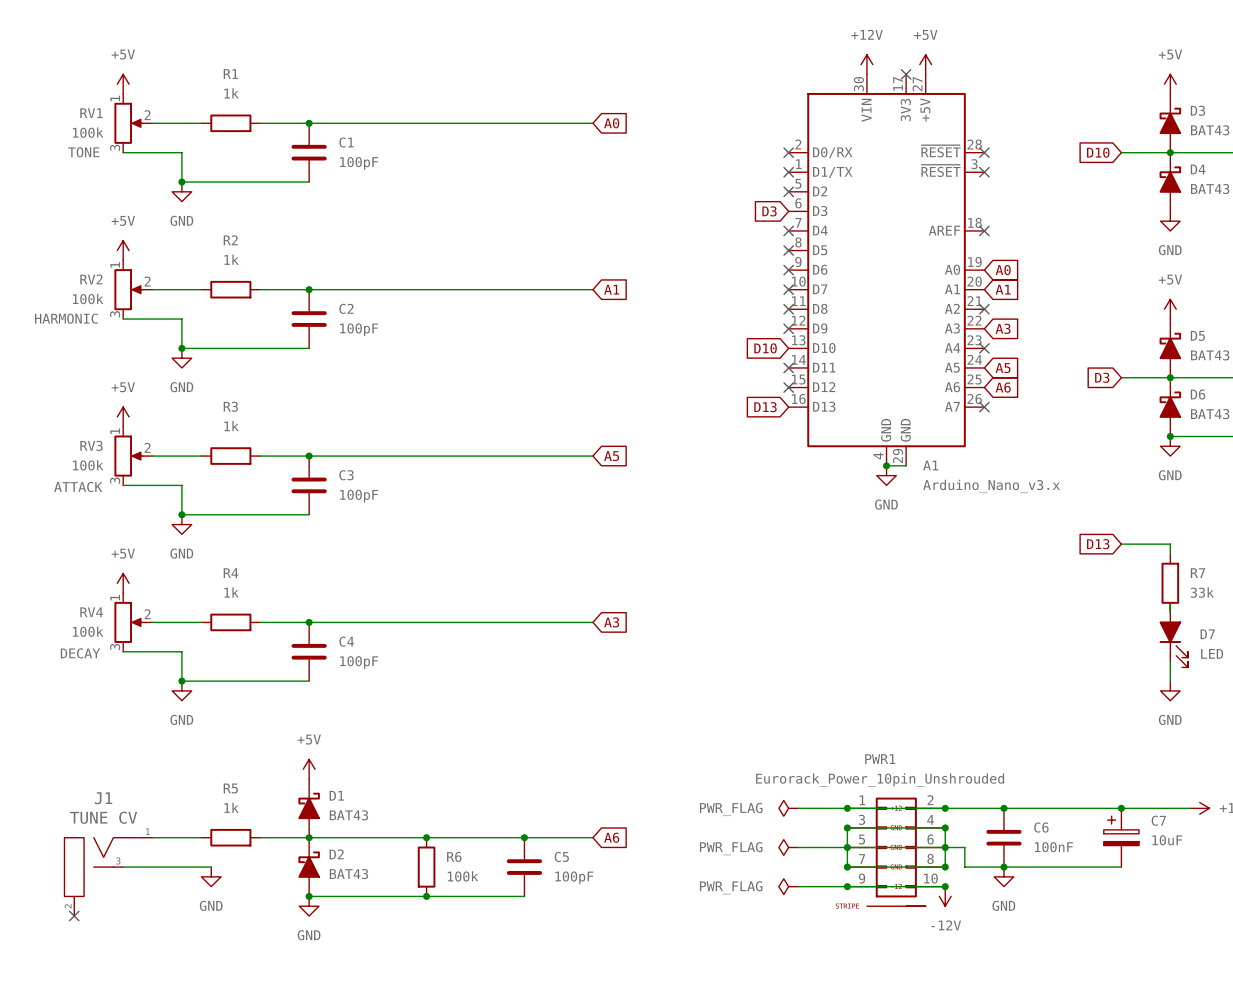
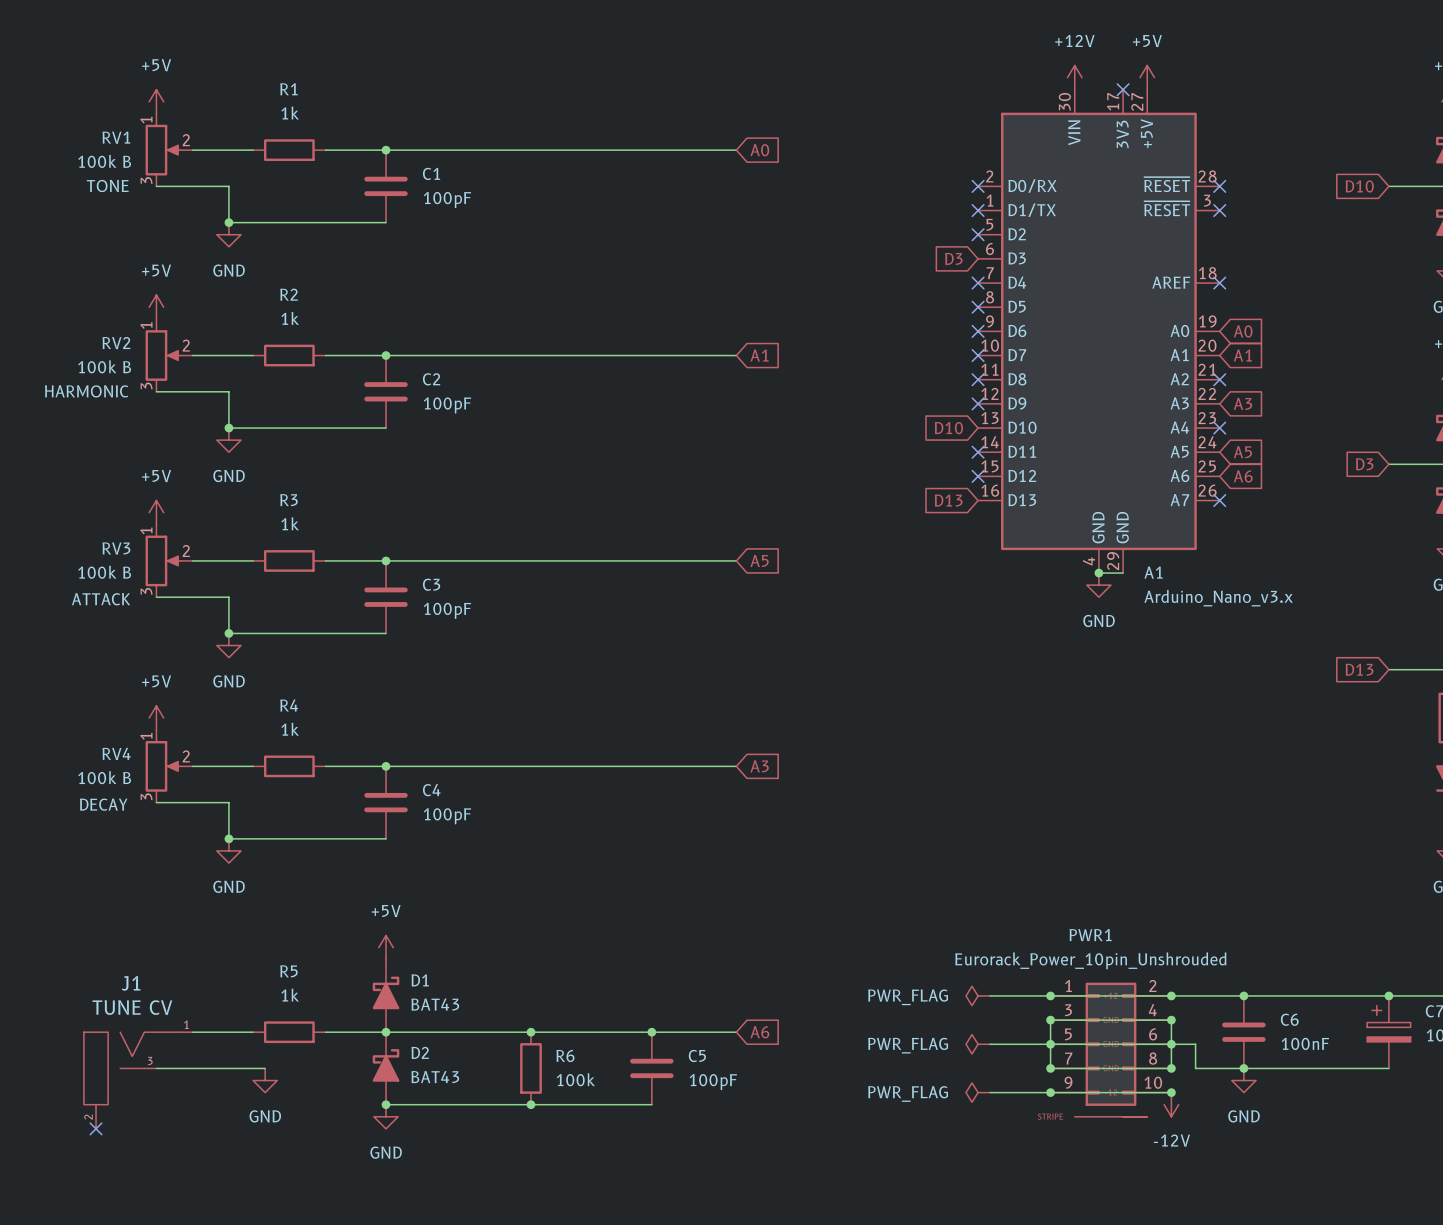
RV1 value: 100k (88, 132) -> 100k B (104, 161)
RV2 value: 100k (88, 298) -> 100k B (104, 366)
RV3 value: 100k (88, 465) -> 100k B (104, 572)
RV4 value: 100k (88, 631) -> 100k B (104, 777)

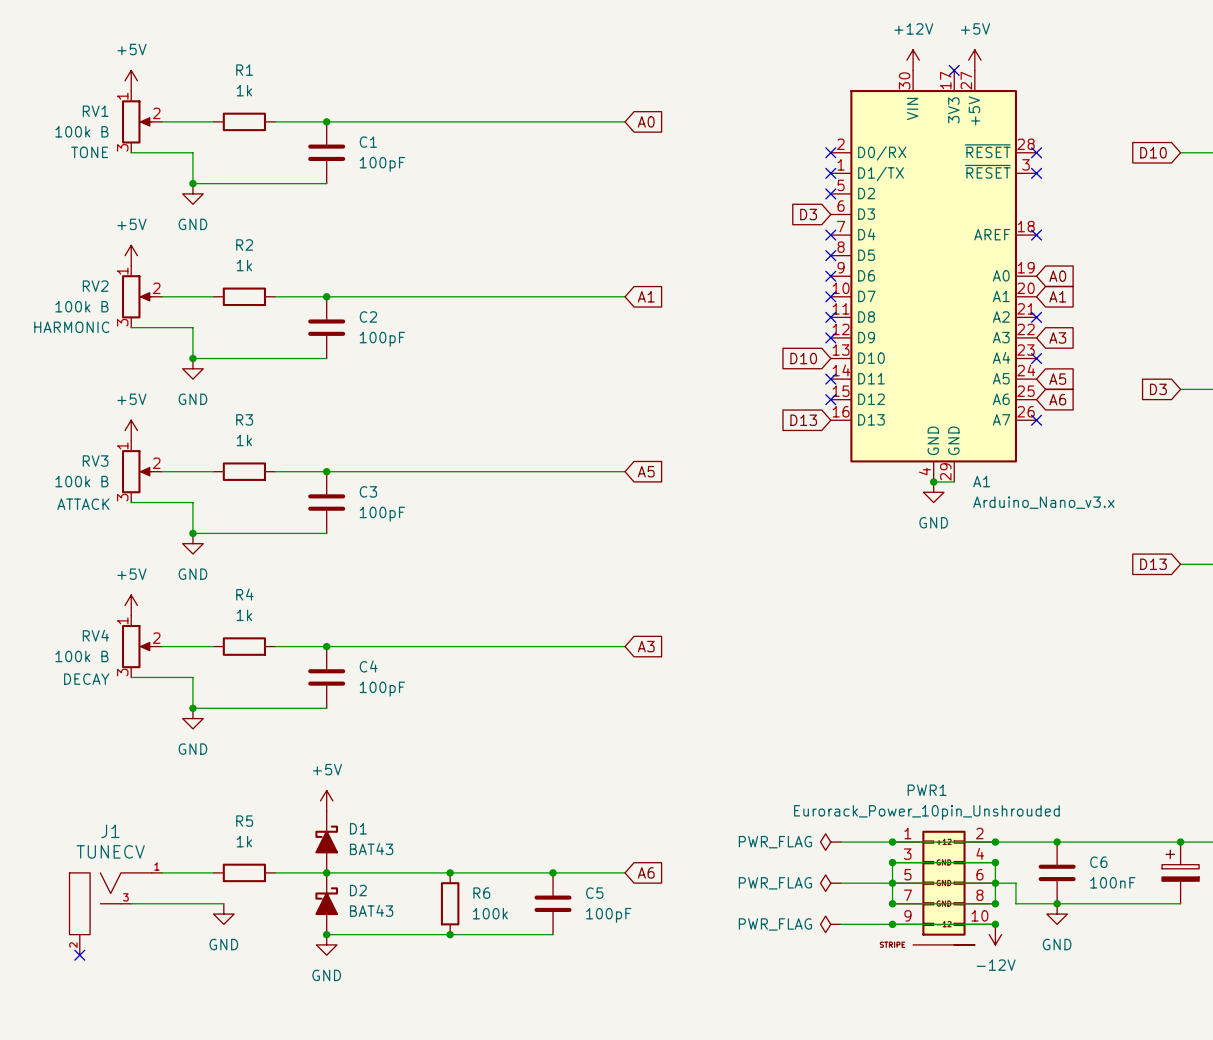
J1 value: TUNE CV (132, 1007) -> TUNECV (110, 851)

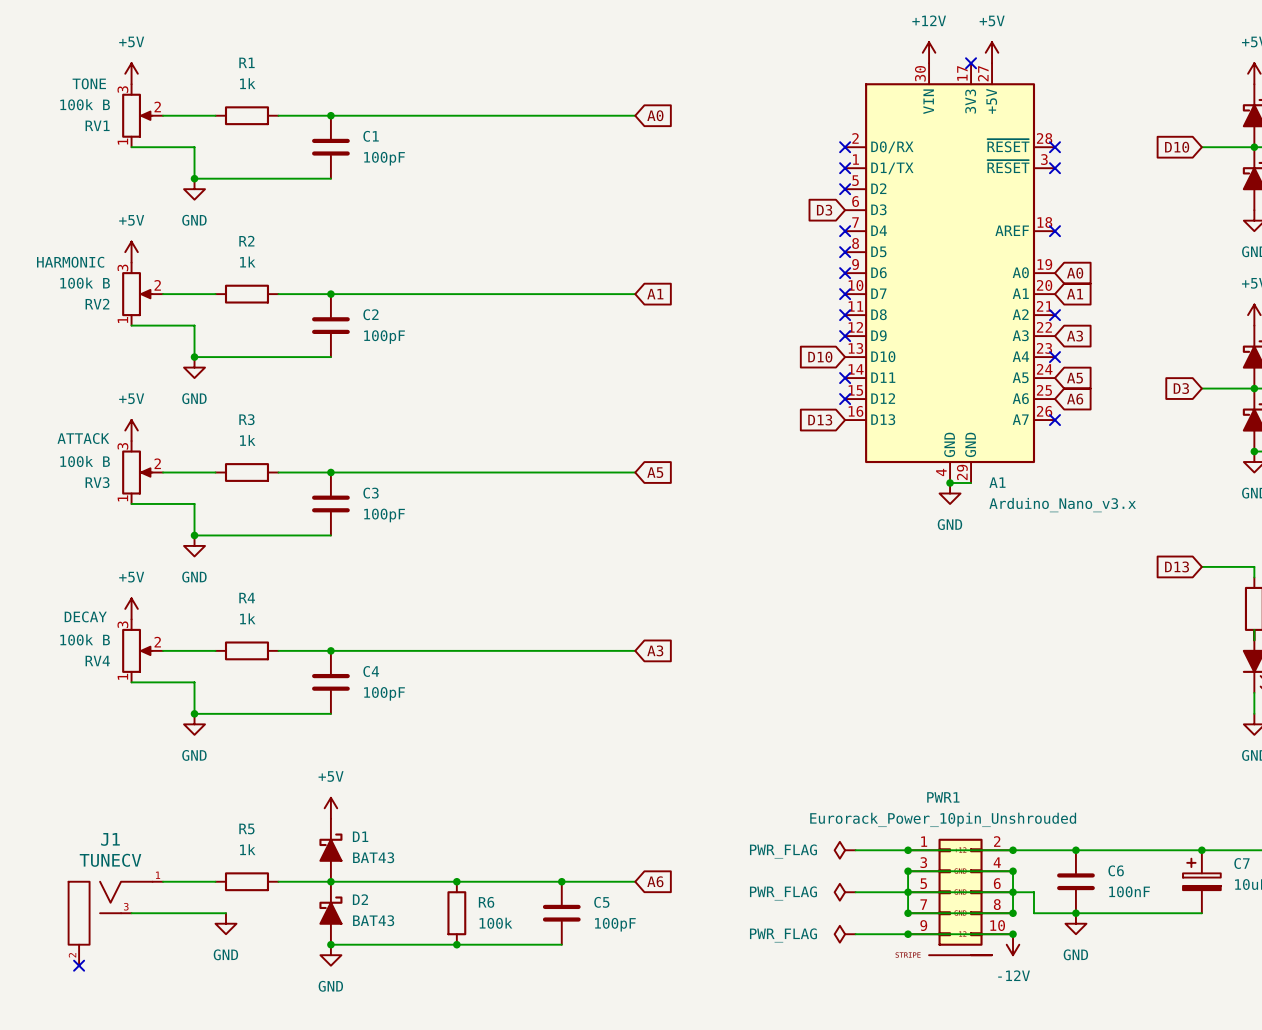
RV1 flip: as is (136, 121) -> up-down (137, 115)
RV2 flip: as is (136, 296) -> up-down (137, 294)
RV3 flip: as is (136, 471) -> up-down (137, 472)
RV4 flip: as is (136, 646) -> up-down (137, 650)

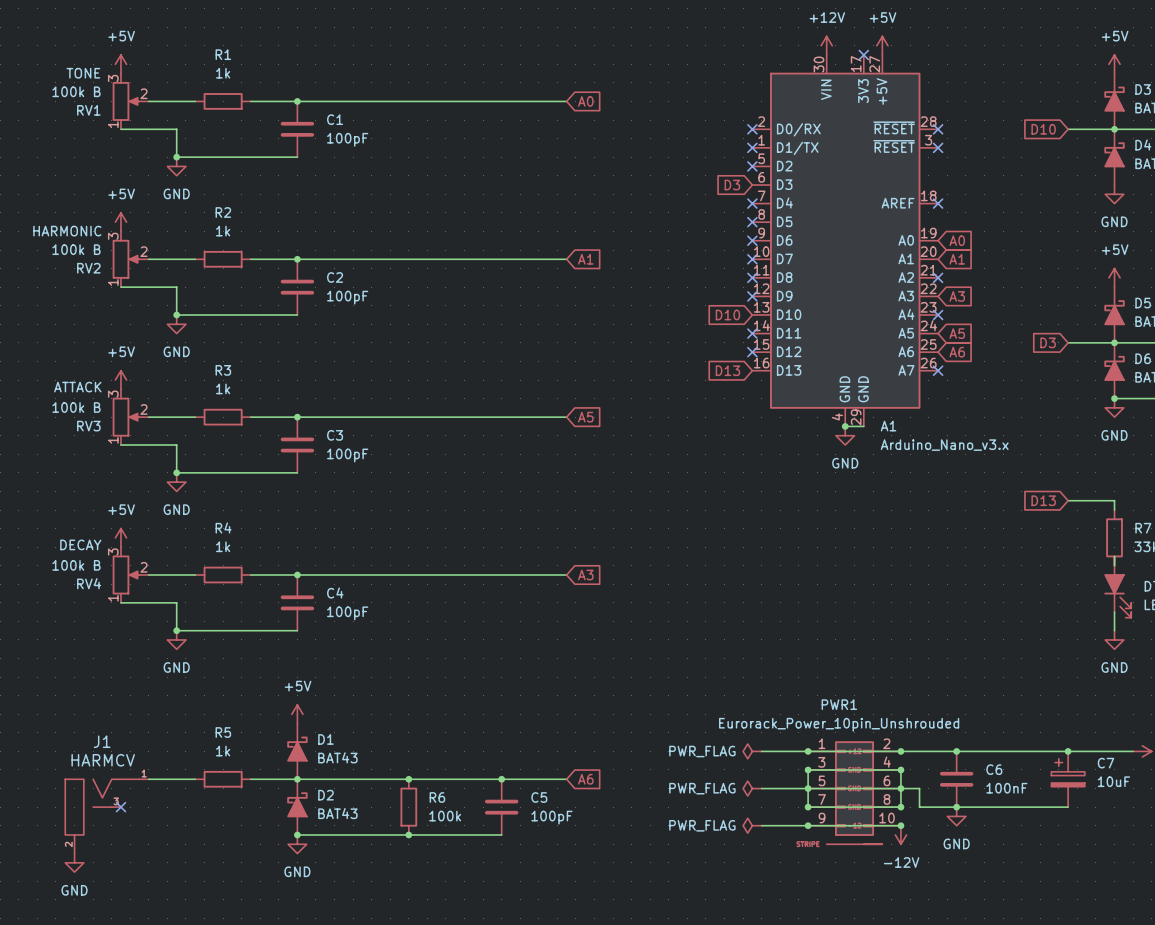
J1 value: TUNECV (110, 860) -> HARMCV (103, 760)
wire: (131, 913) (226, 913) -> none
no-connect mark: none -> (120, 807)
power symbol position: GND (226, 923) -> GND (74, 862)
no-connect mark: (79, 965) -> none

